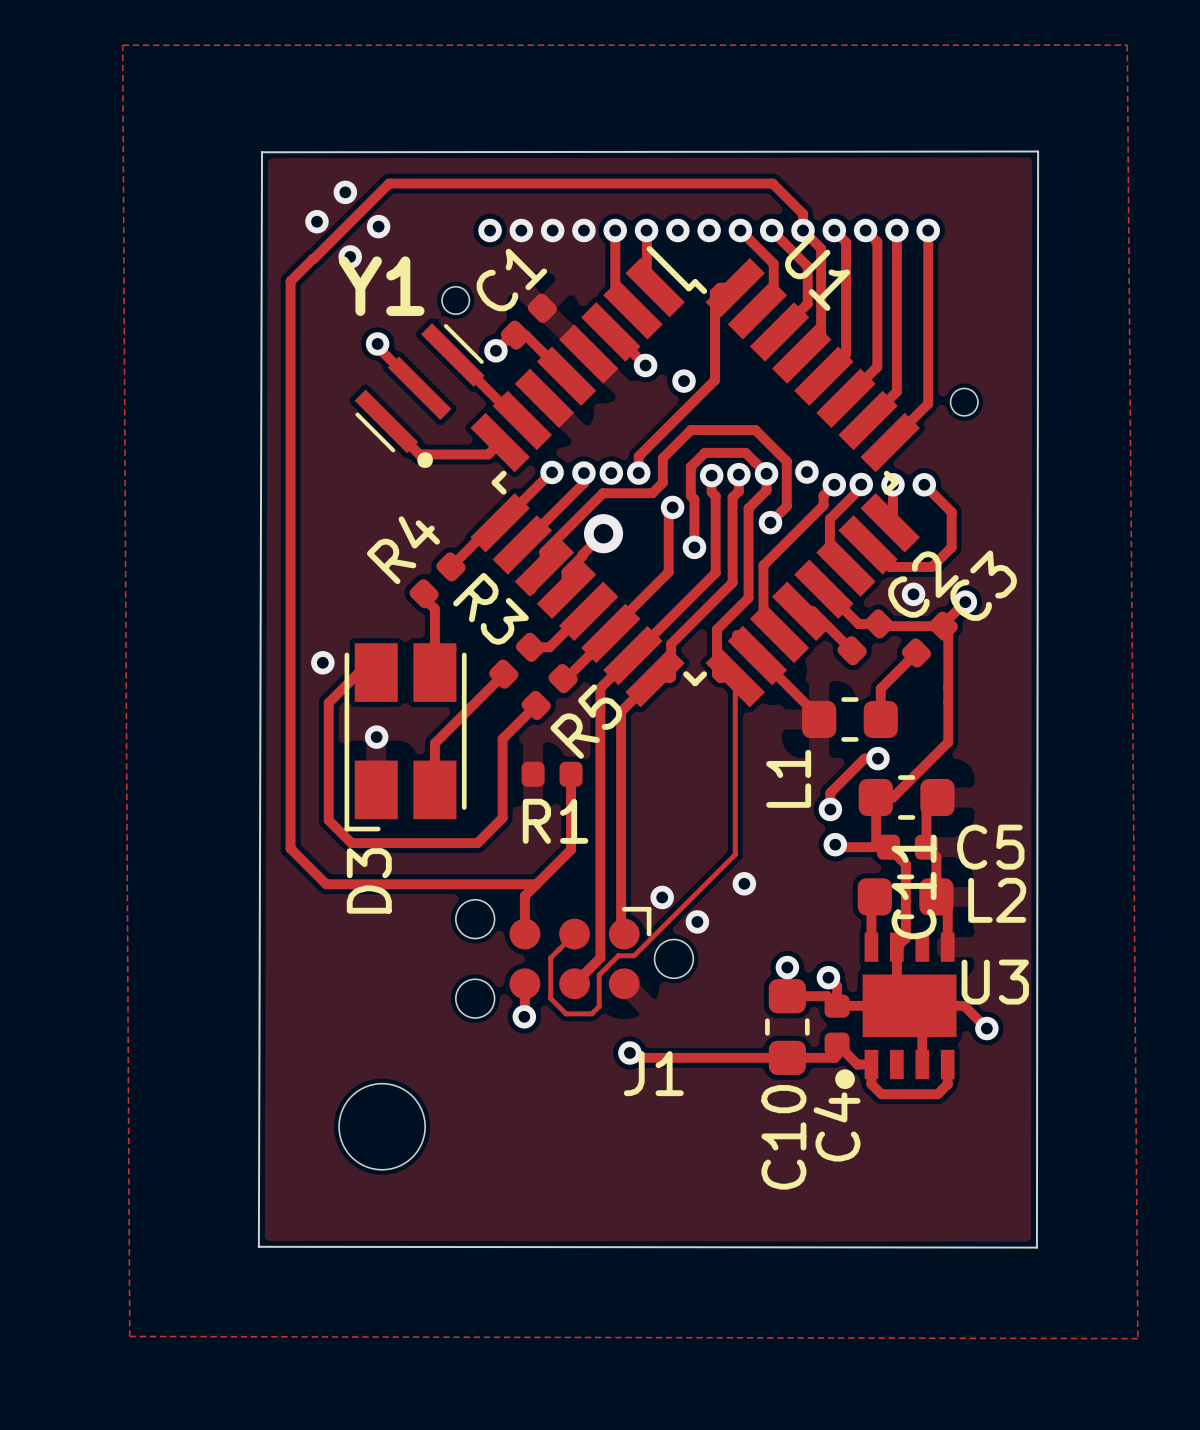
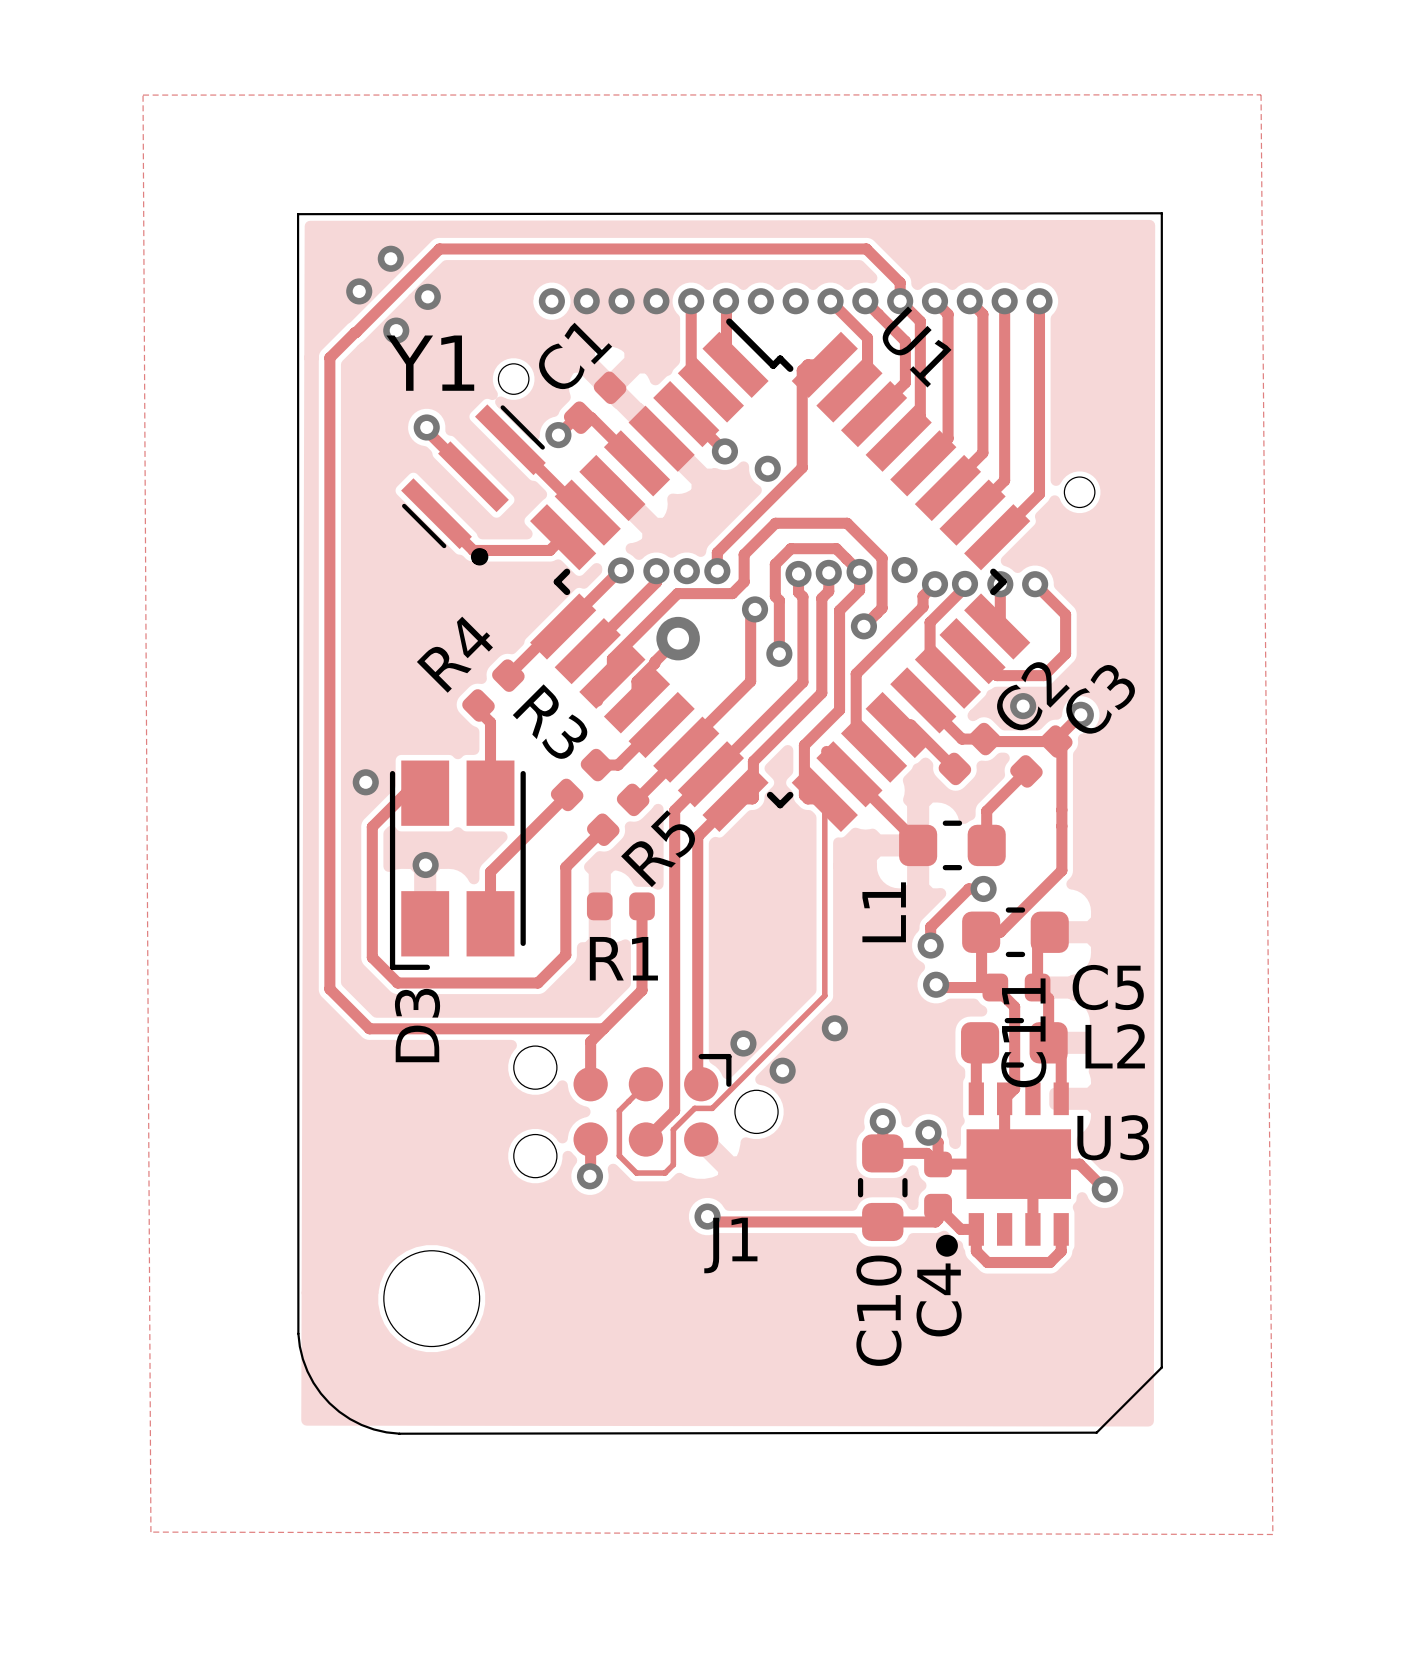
board edge: (1038, 151) (1036, 1247) (258, 1246) (262, 152) -> (1161, 213) (1161, 1367) (1096, 1432) (399, 1433) (373, 1429) (361, 1425) (350, 1419) (329, 1403) (320, 1393) (307, 1371) (302, 1359) (298, 1333) (298, 214)

